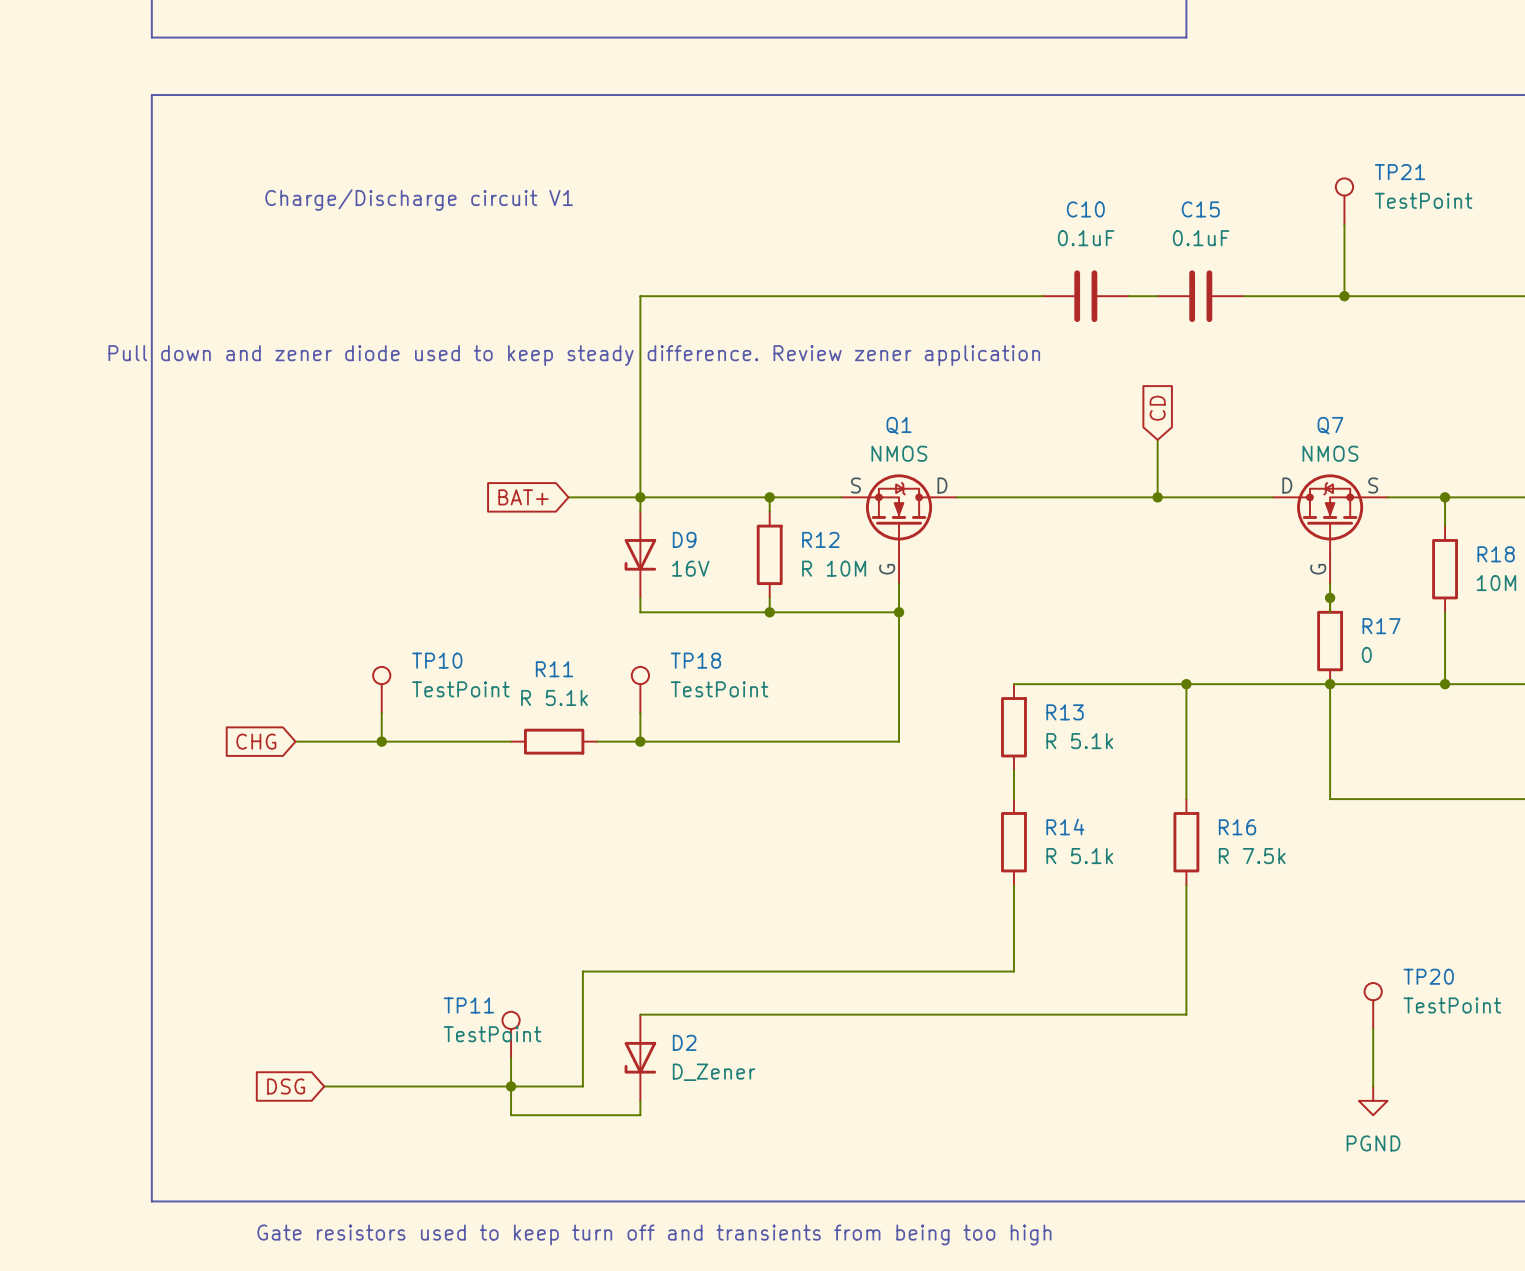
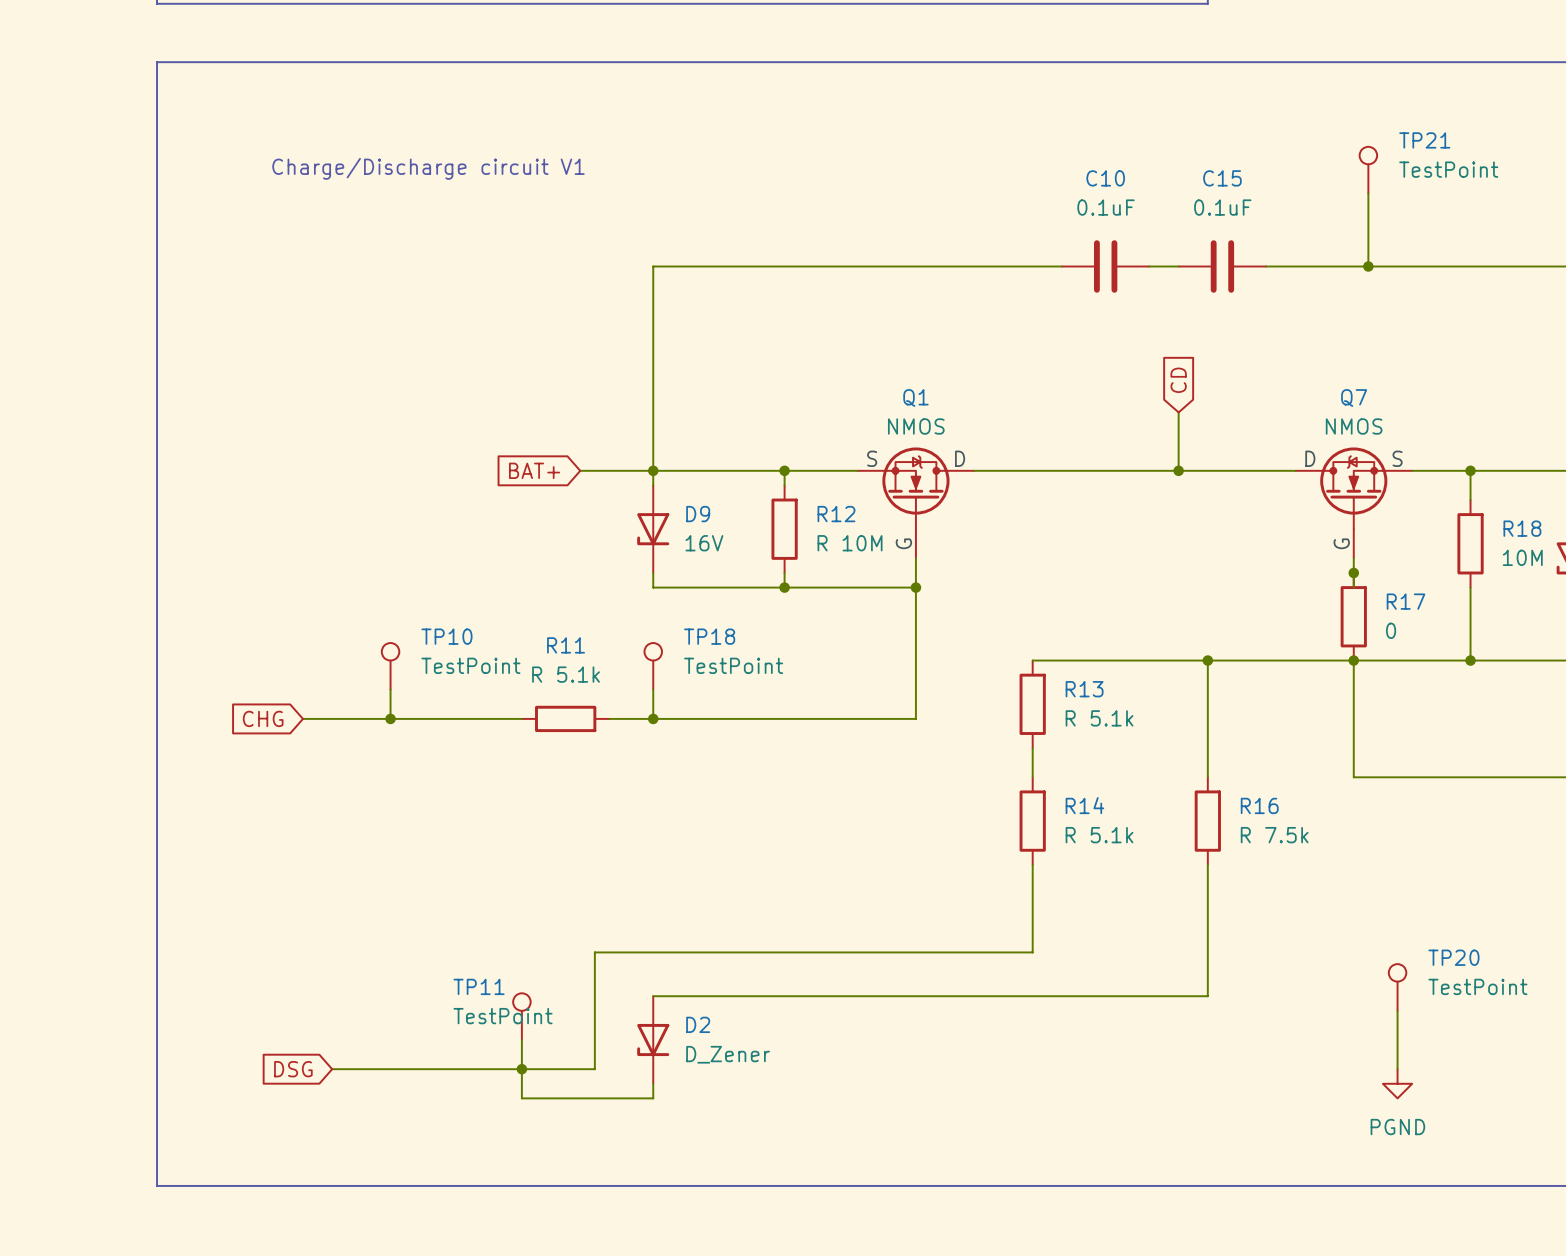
text: Pull down and zener diode used to keep steady difference. Review zener application (574, 355) -> none
text: Gate resistors used to keep turn off and transients from being too high (654, 1234) -> none

